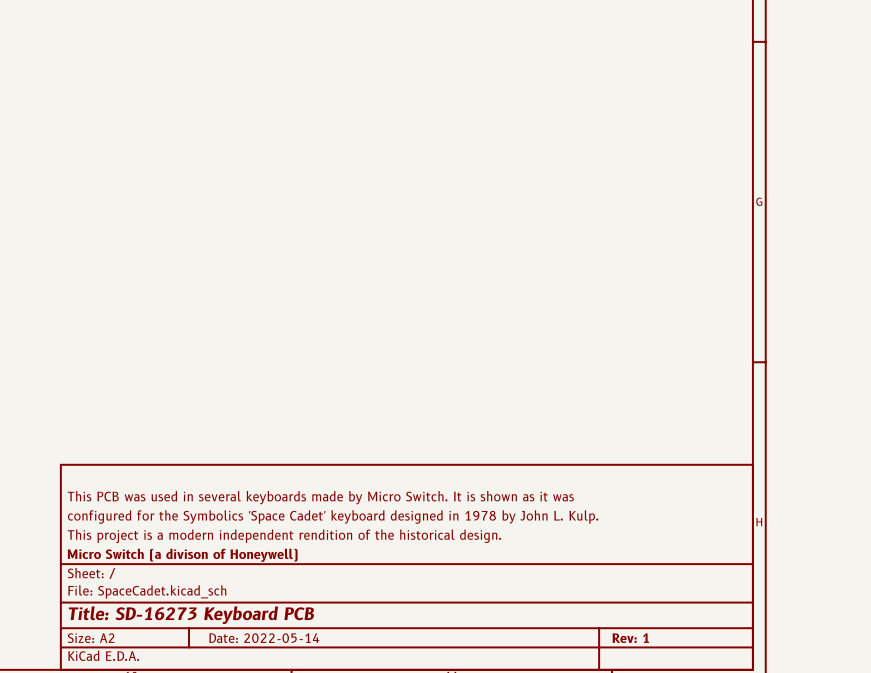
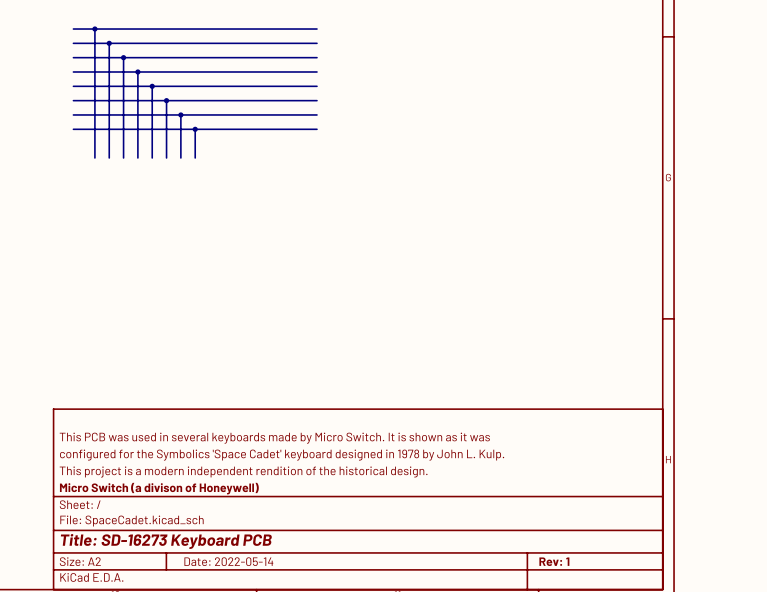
wire: none -> (73, 29) (316, 29)
wire: none -> (94, 29) (94, 157)
junction: none -> (94, 29)
wire: none -> (73, 43) (316, 43)
wire: none -> (109, 43) (109, 157)
junction: none -> (109, 43)
wire: none -> (73, 57) (316, 57)
wire: none -> (123, 57) (123, 157)
junction: none -> (123, 57)
wire: none -> (73, 71) (316, 71)
wire: none -> (137, 71) (137, 157)
junction: none -> (137, 71)
wire: none -> (73, 86) (316, 86)
wire: none -> (152, 86) (152, 157)
junction: none -> (152, 86)
wire: none -> (73, 100) (316, 100)
wire: none -> (166, 100) (166, 157)
junction: none -> (166, 100)
wire: none -> (73, 114) (316, 114)
wire: none -> (180, 114) (180, 157)
junction: none -> (180, 114)
wire: none -> (73, 129) (316, 129)
wire: none -> (195, 129) (195, 157)
junction: none -> (195, 129)

